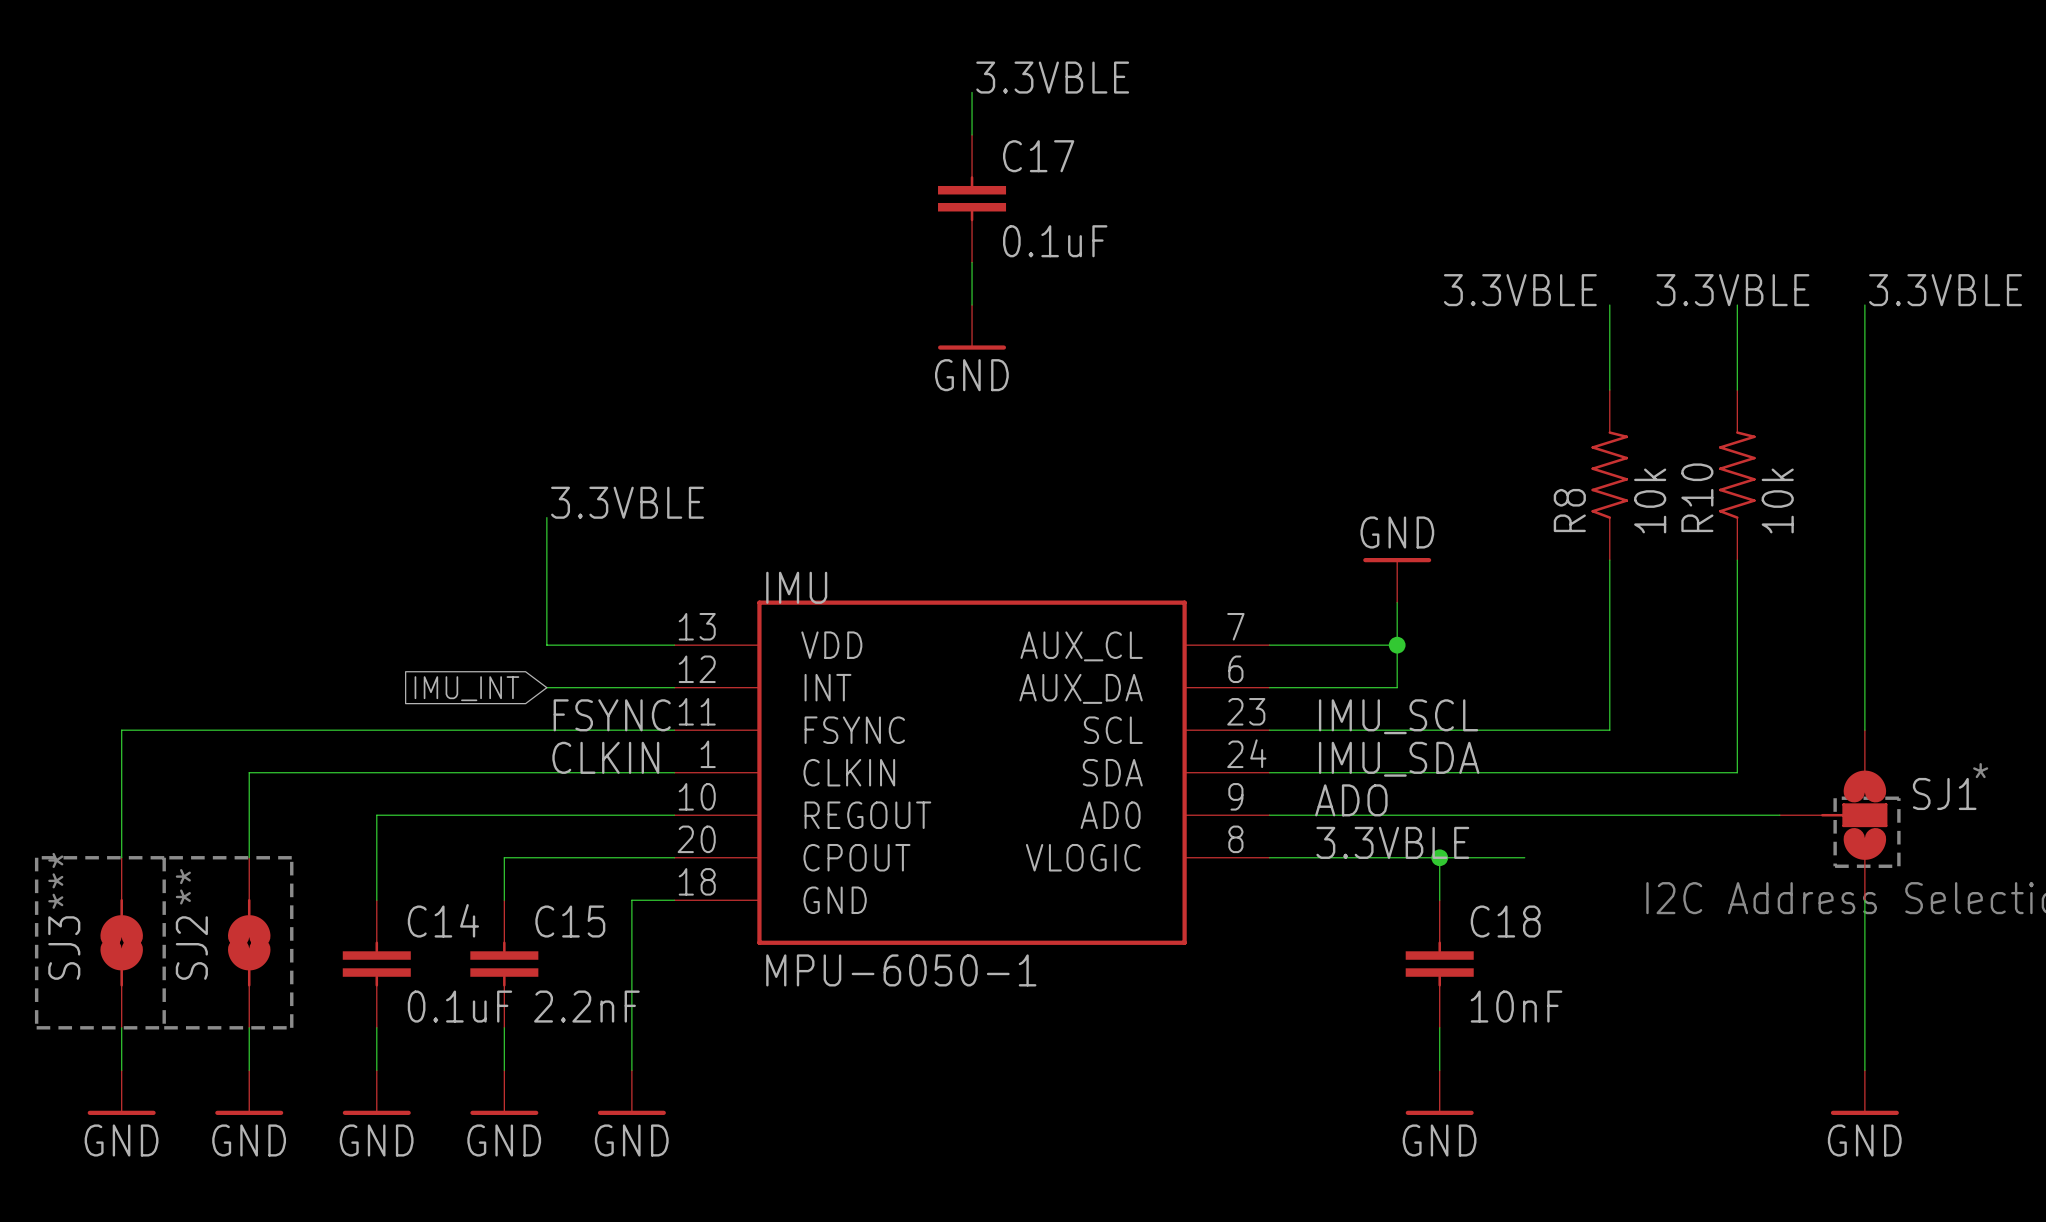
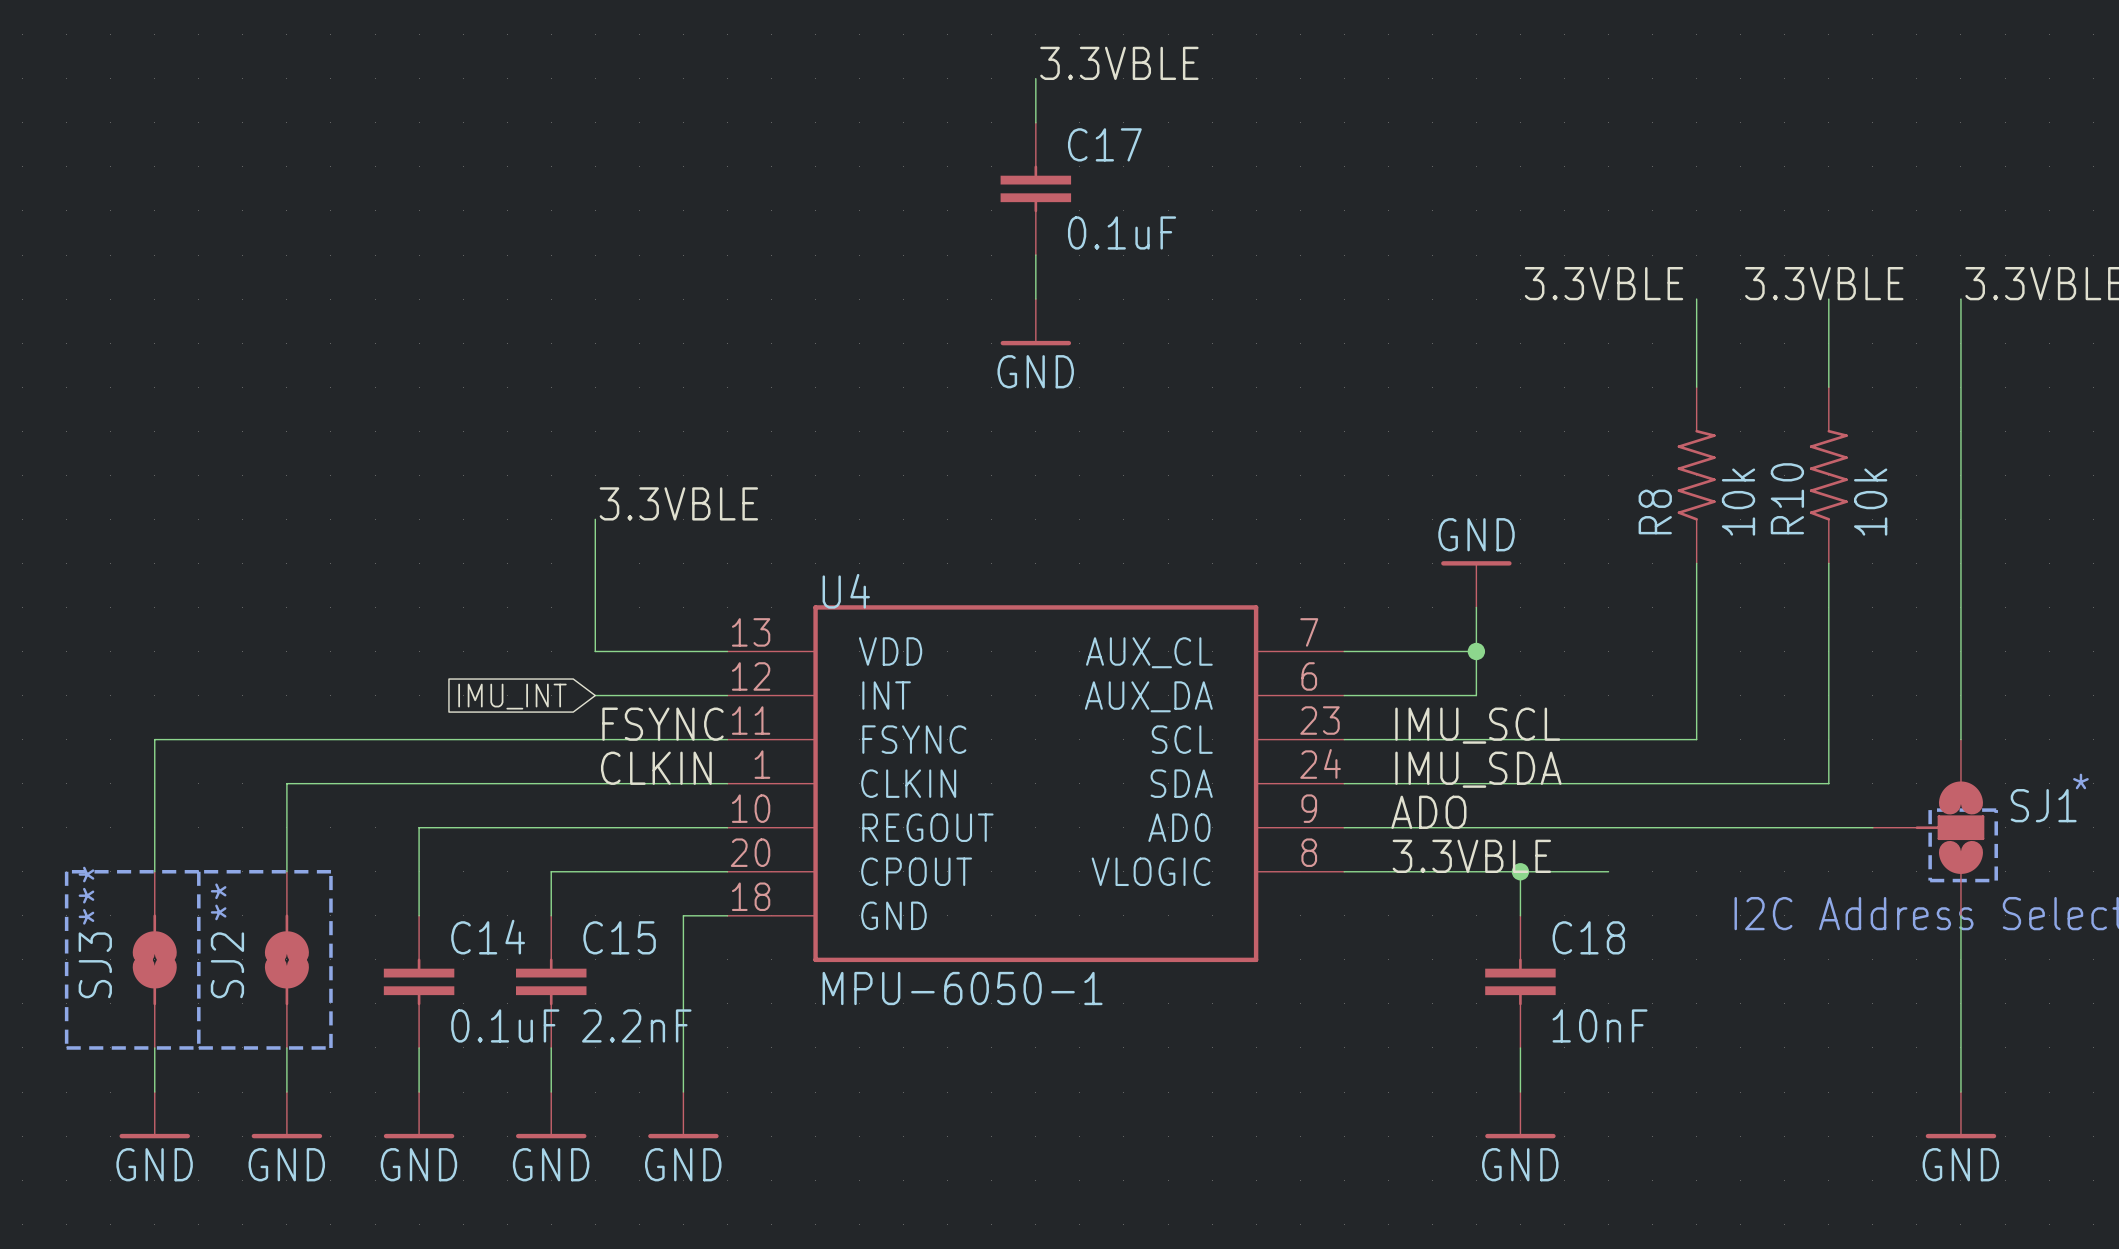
IMU name: IMU (796, 587) -> U4 (846, 591)

